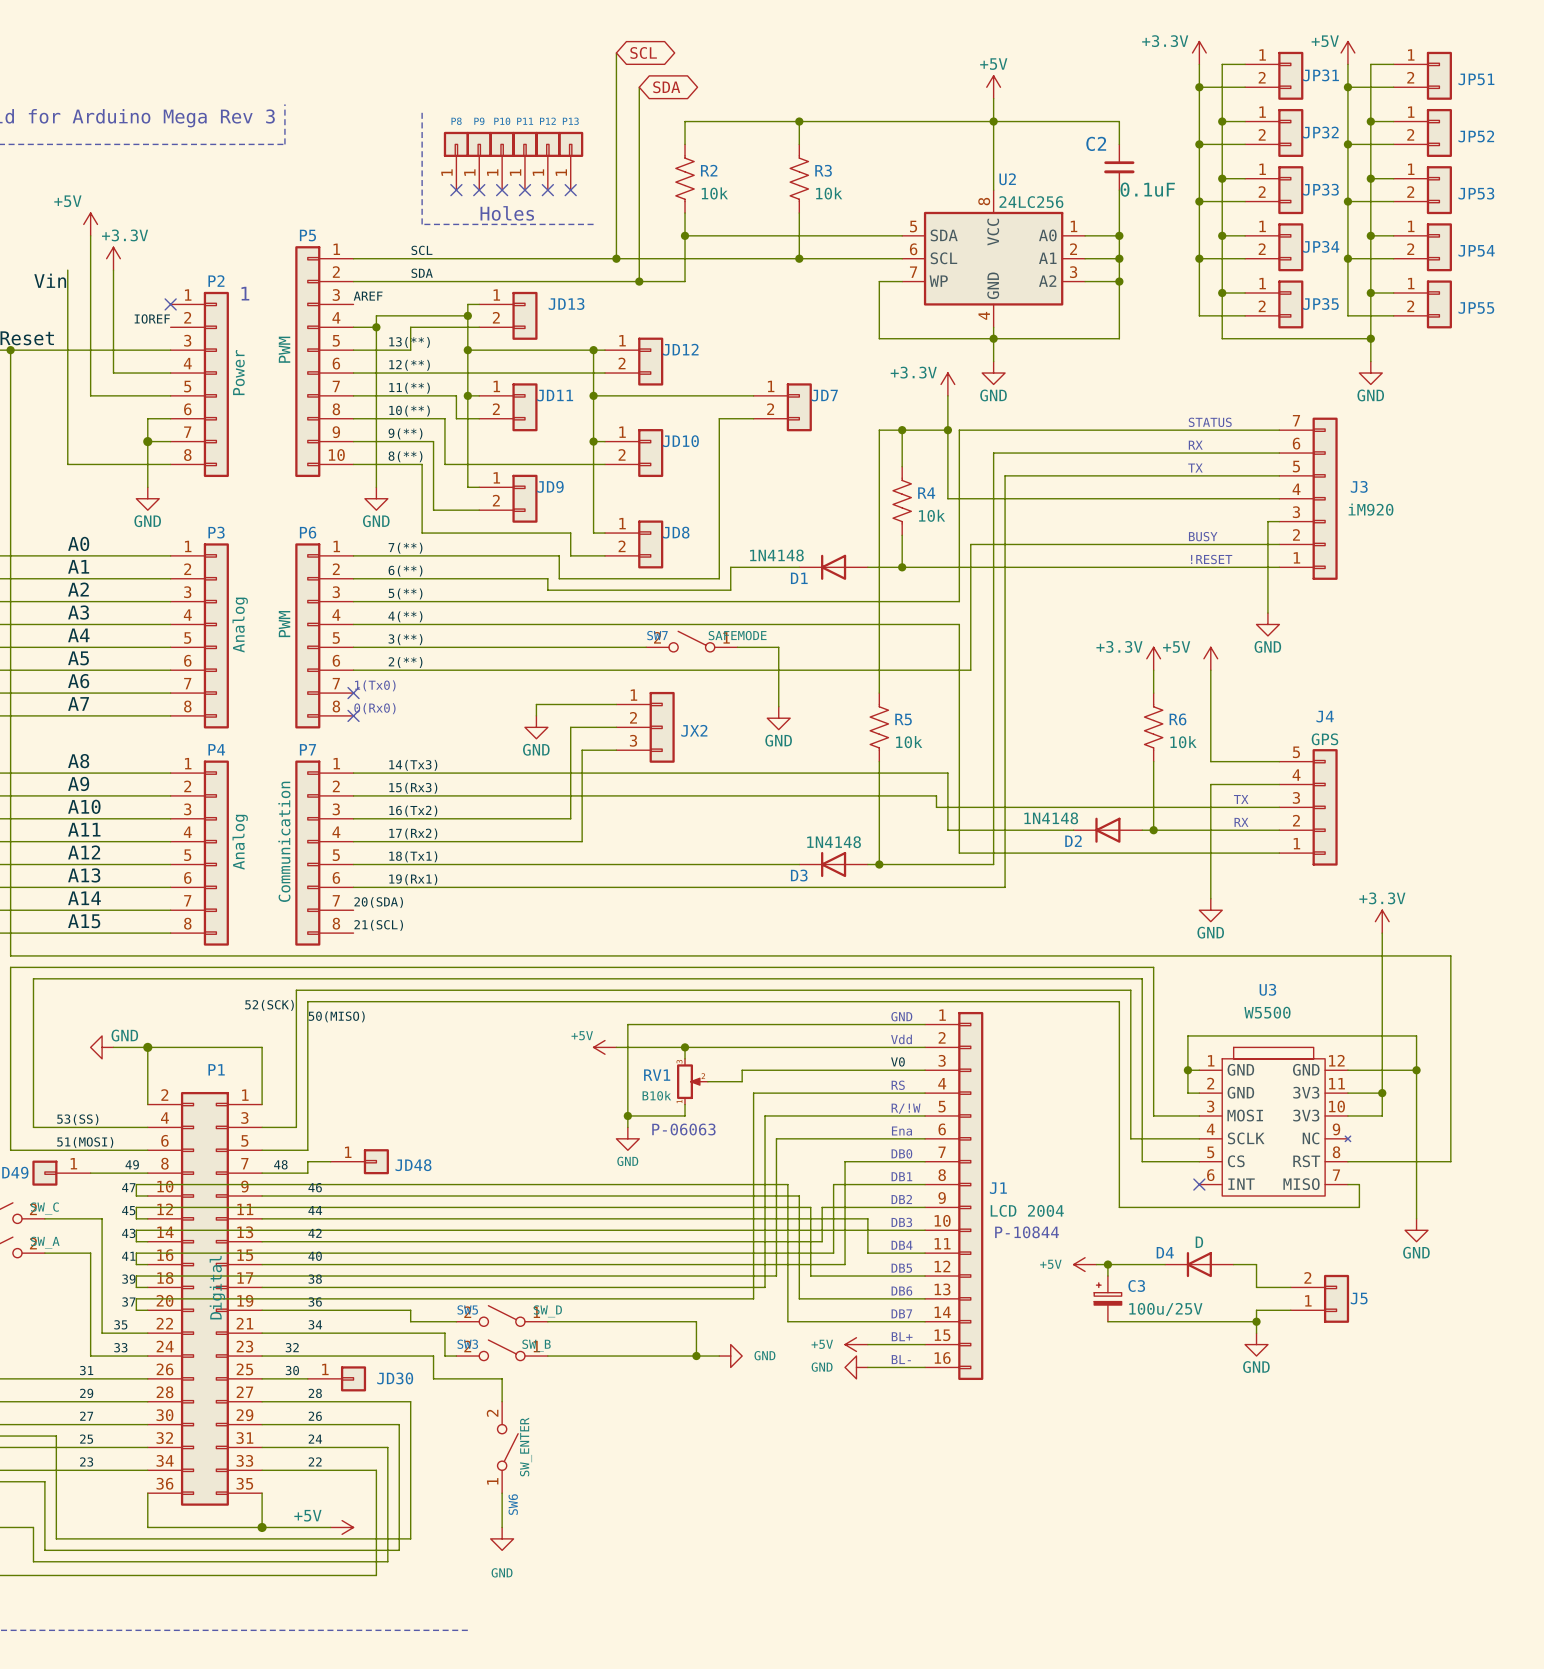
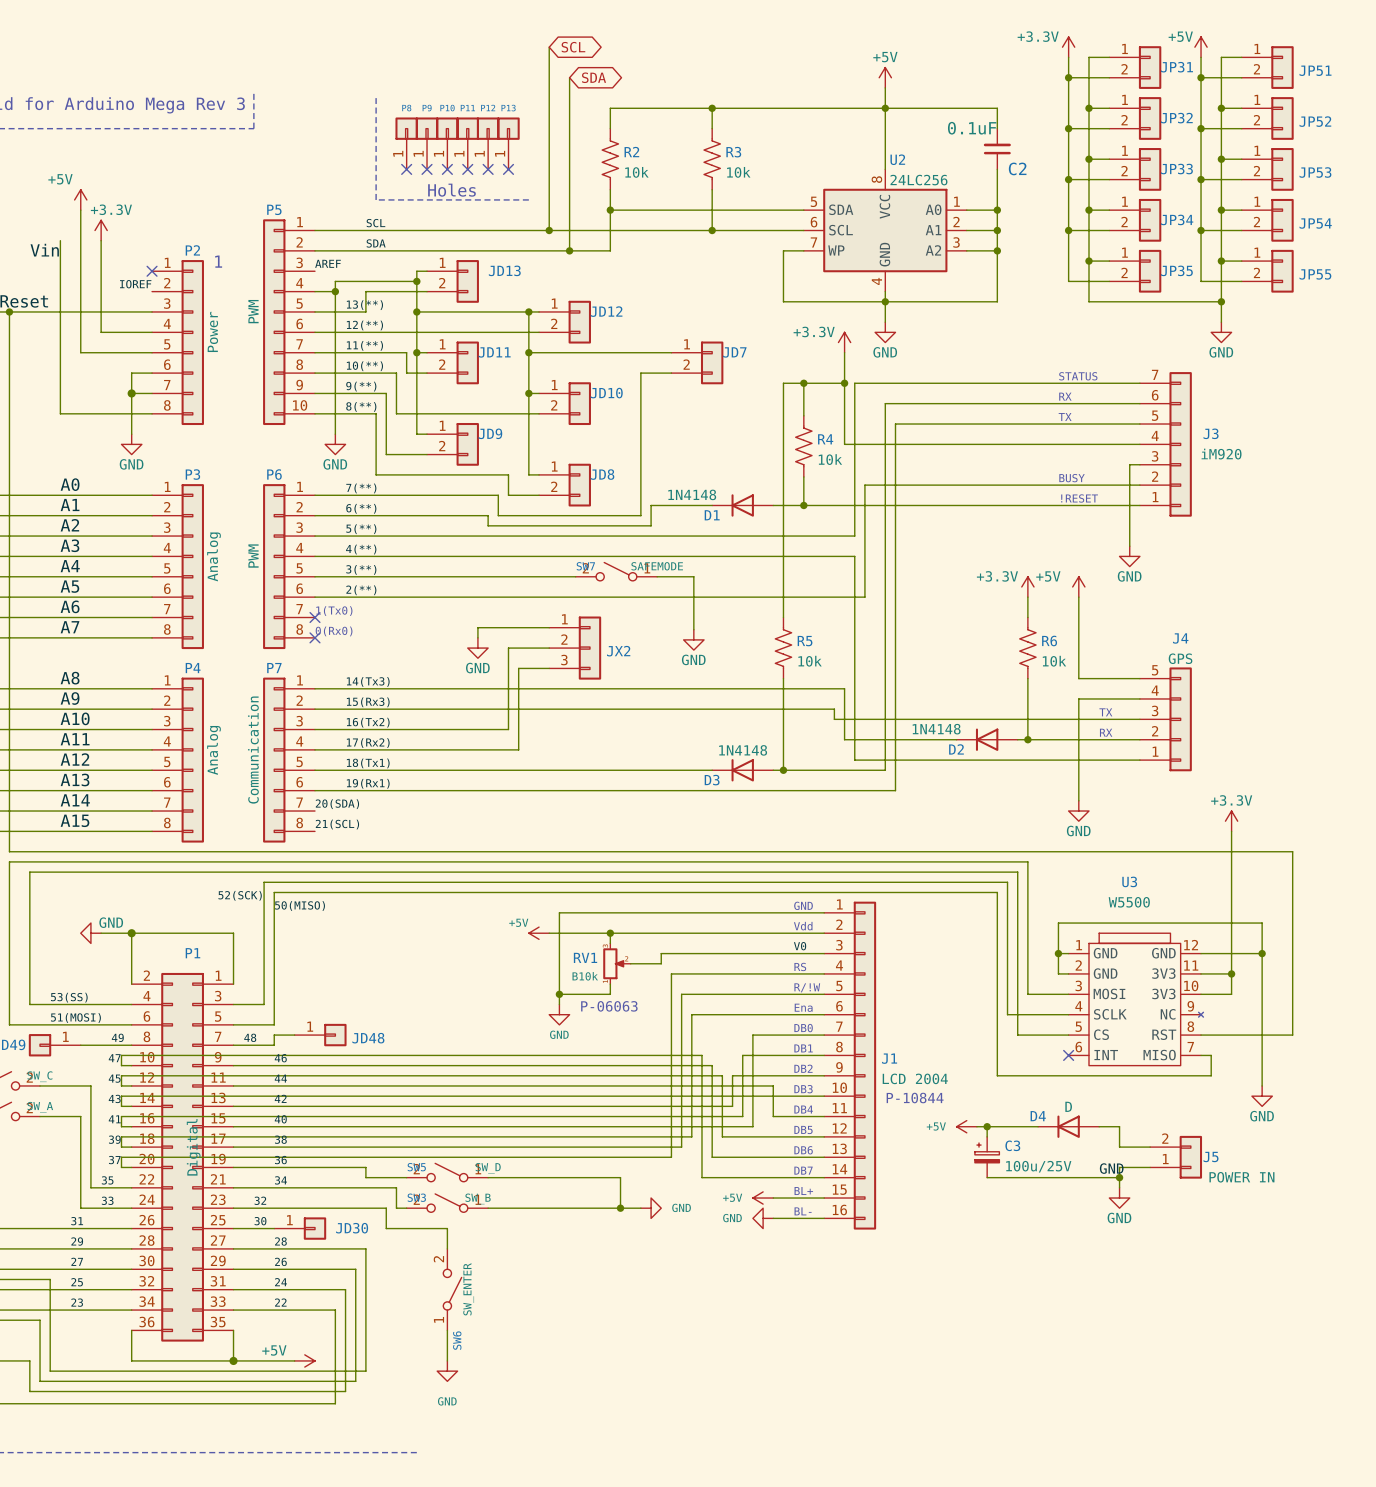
C2 rotation: 0° (1119, 167) -> 180° (997, 148)
label: none -> GND (1111, 1168)
J5 value: none -> POWER IN (1241, 1177)

